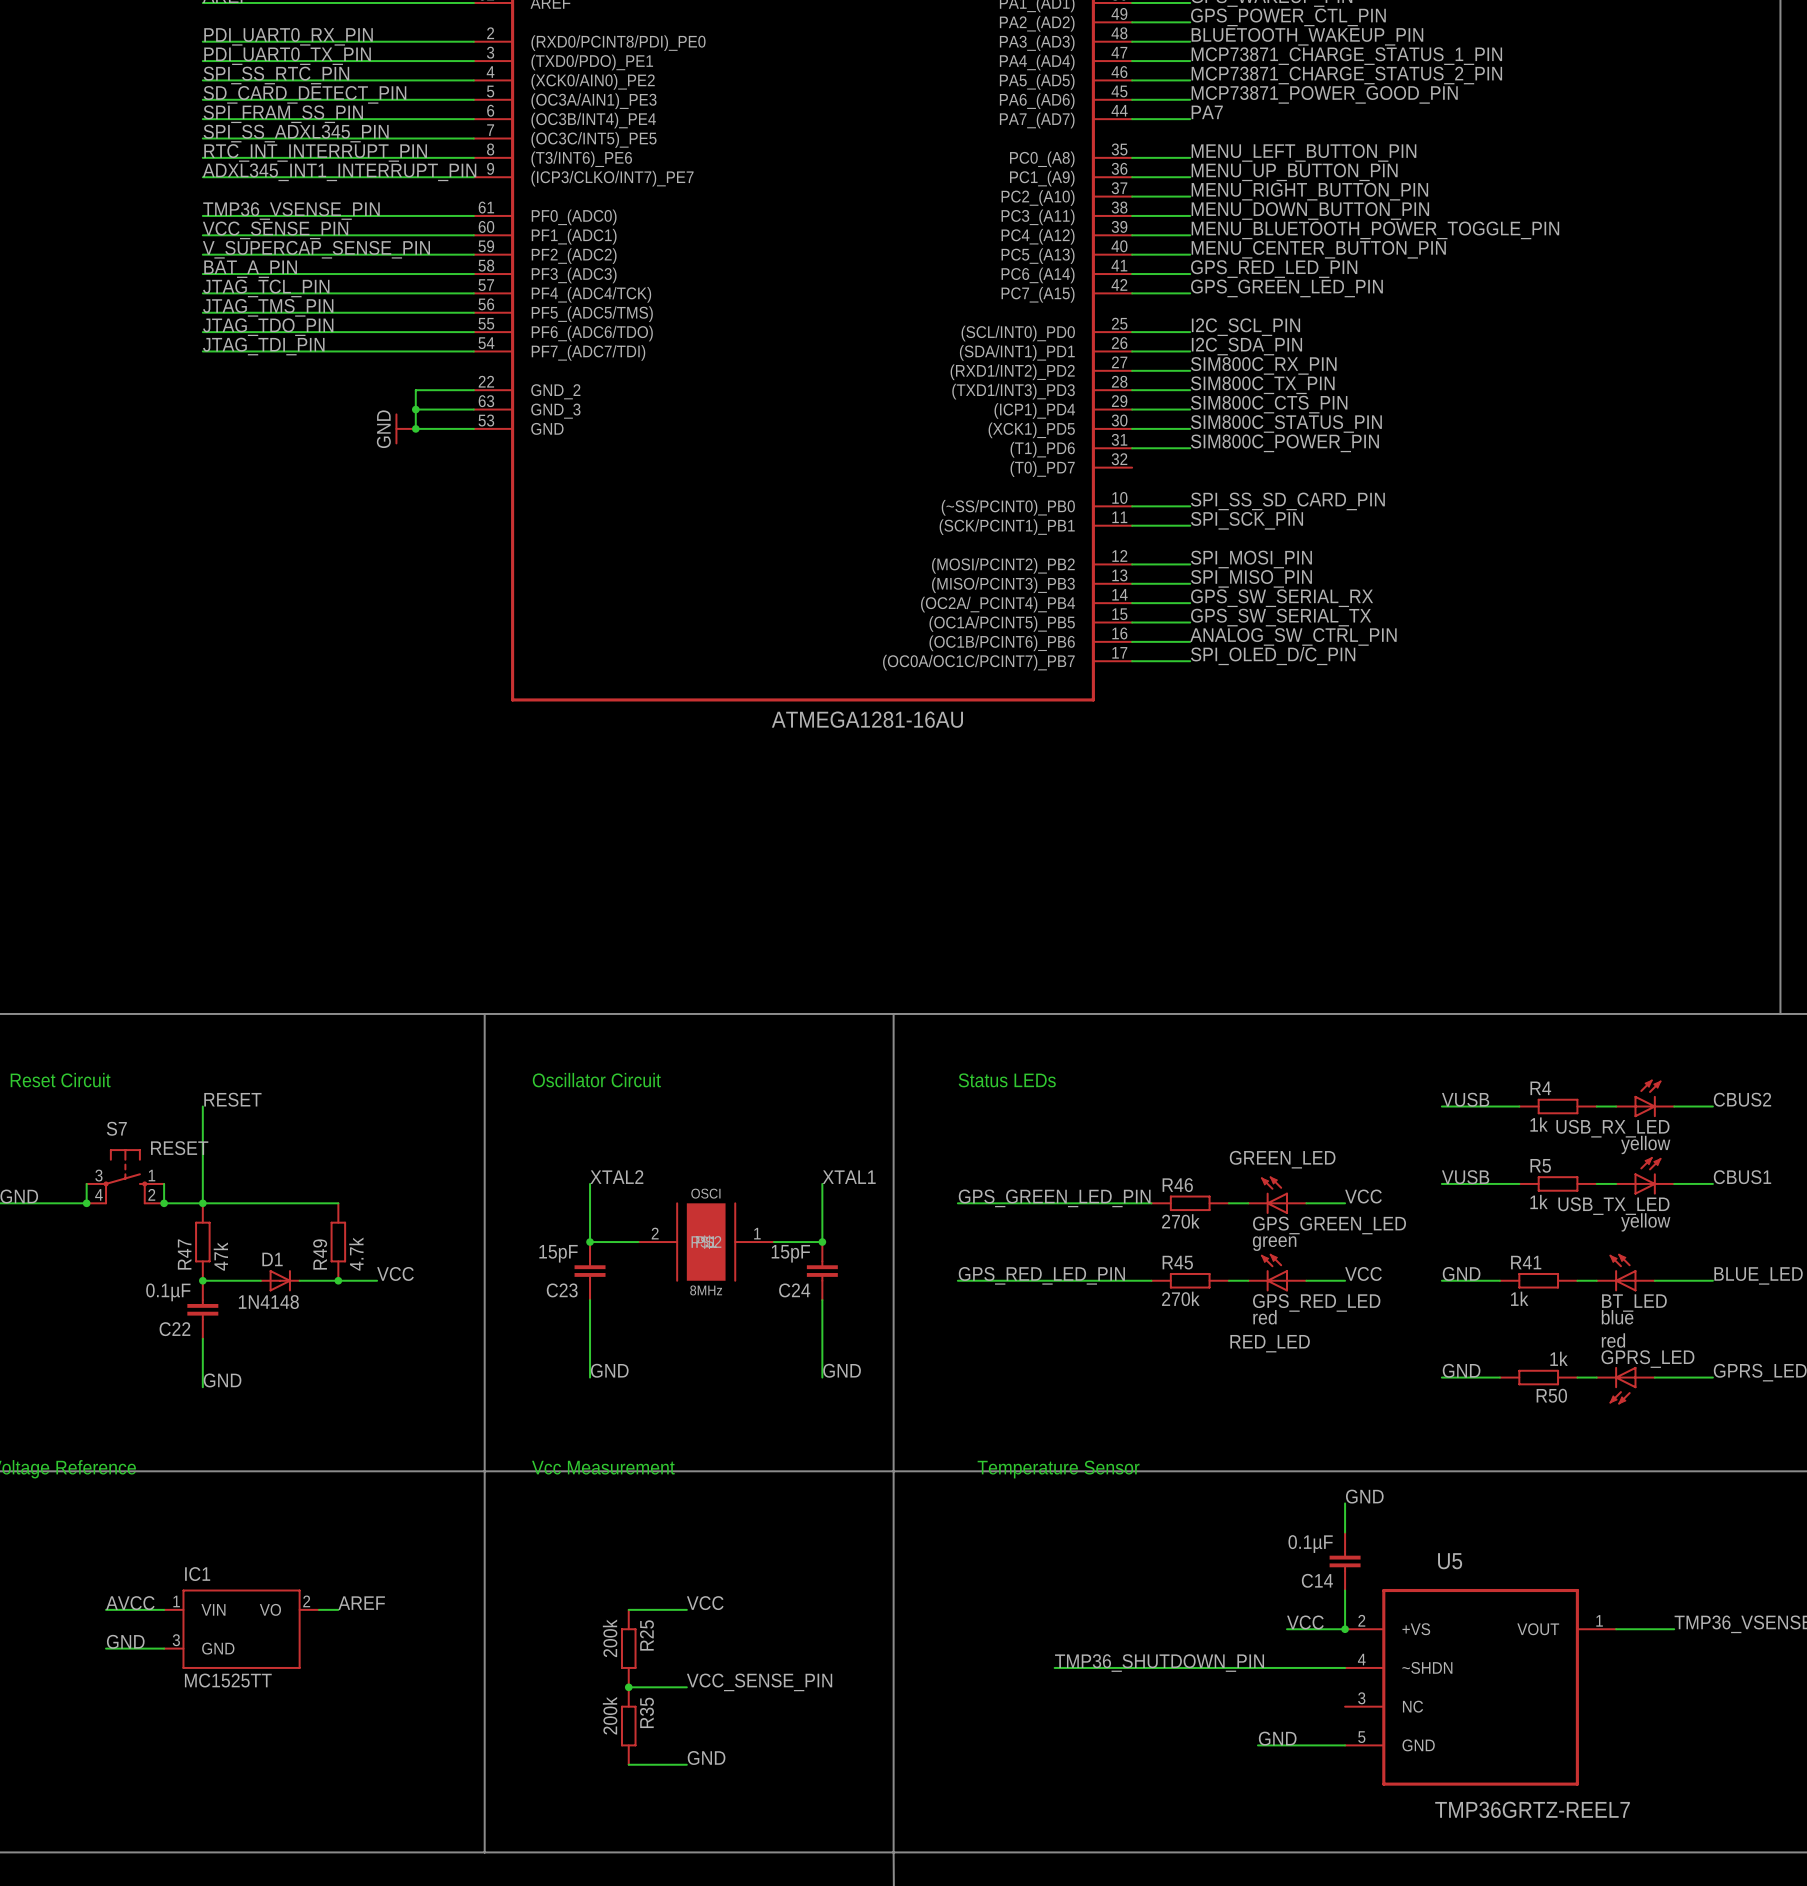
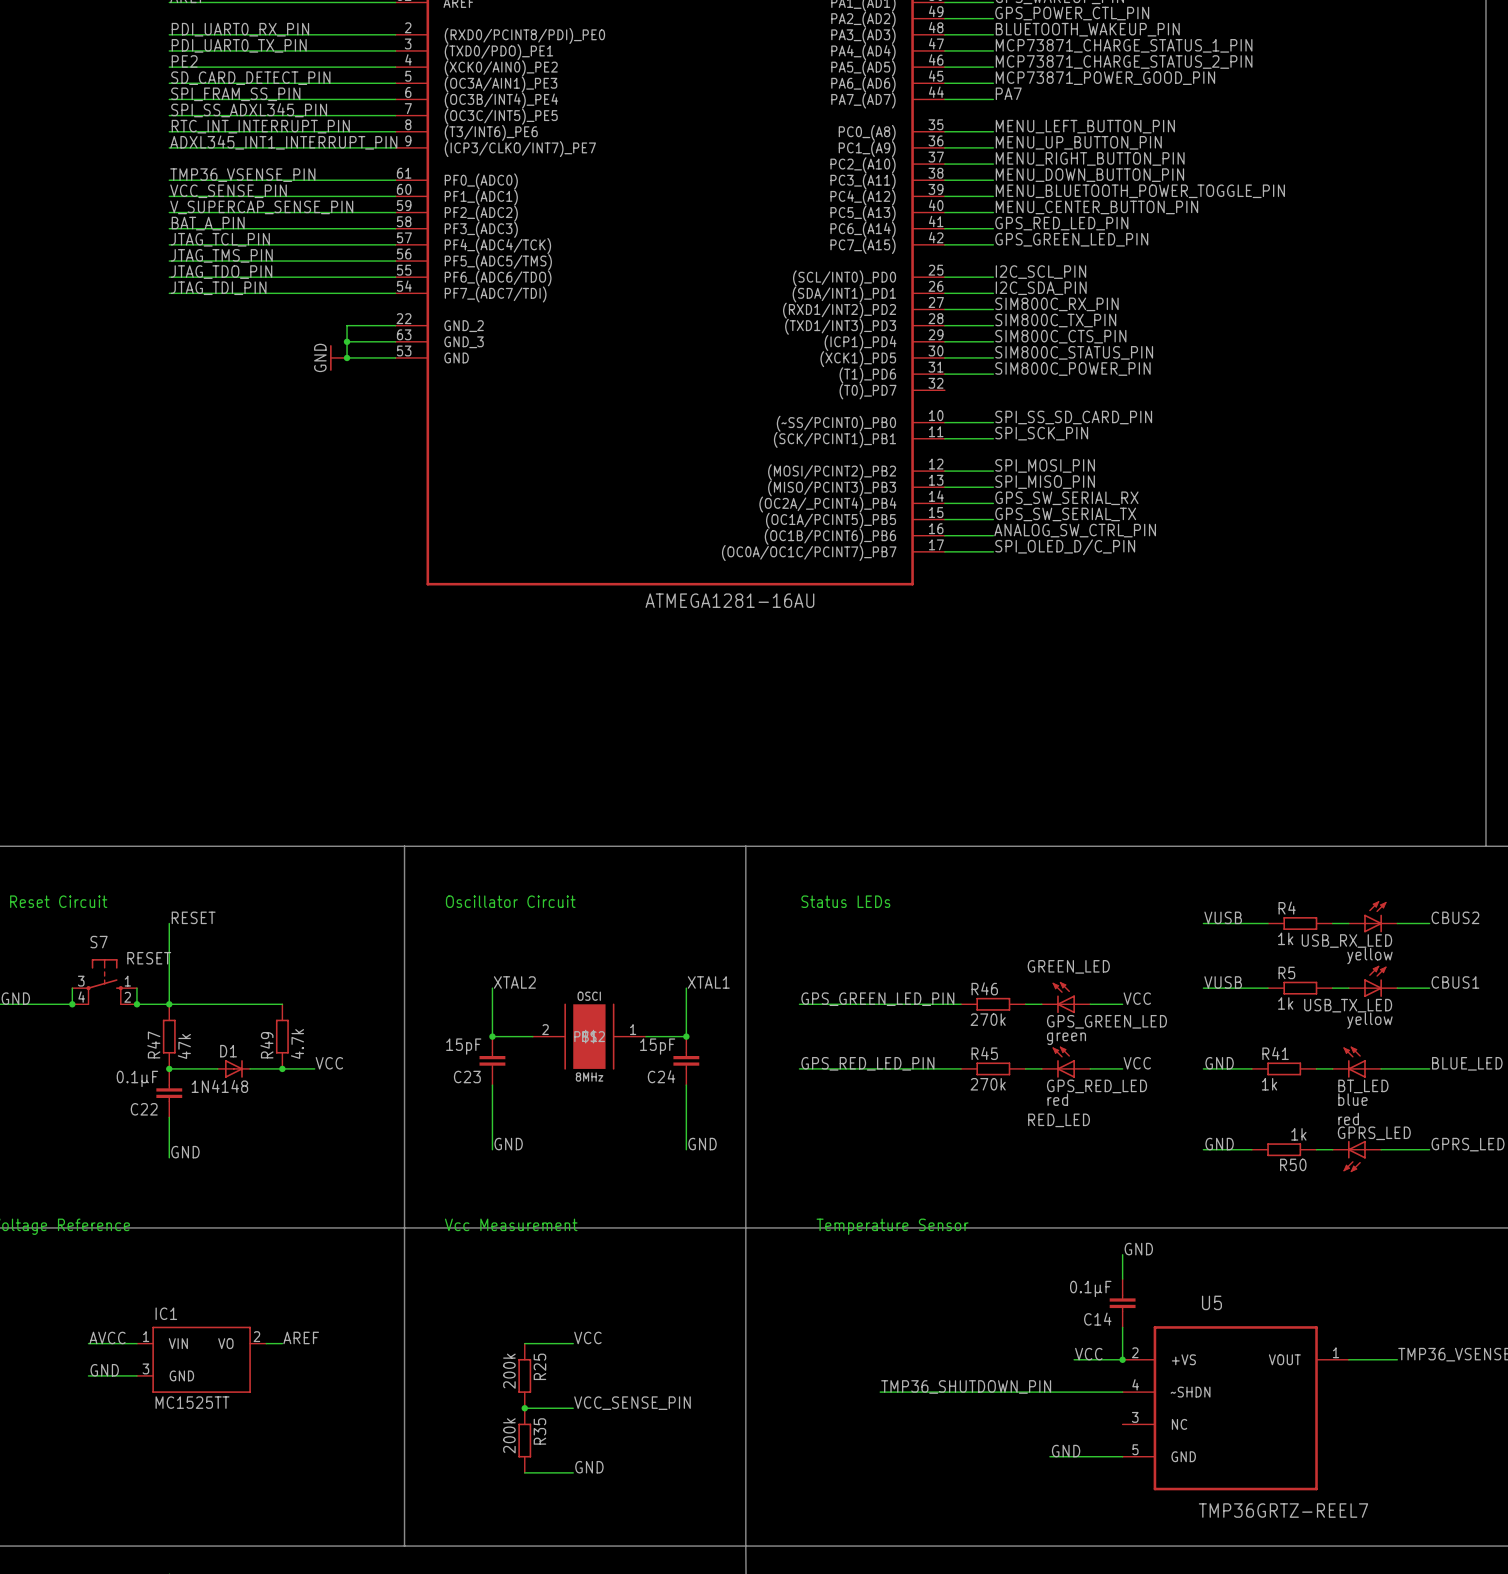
label: SPI_SS_RTC_PIN (276, 75) -> PE2 (184, 61)

